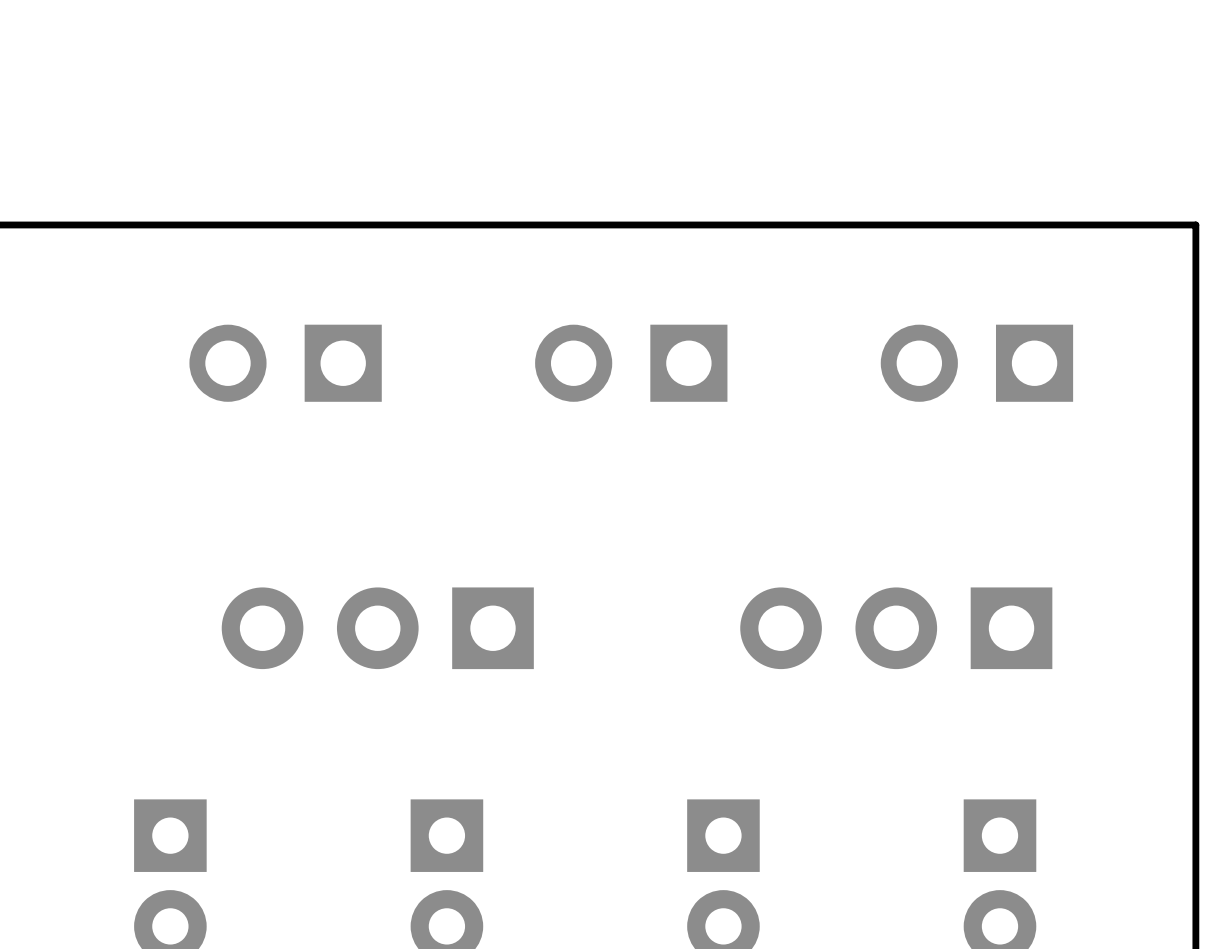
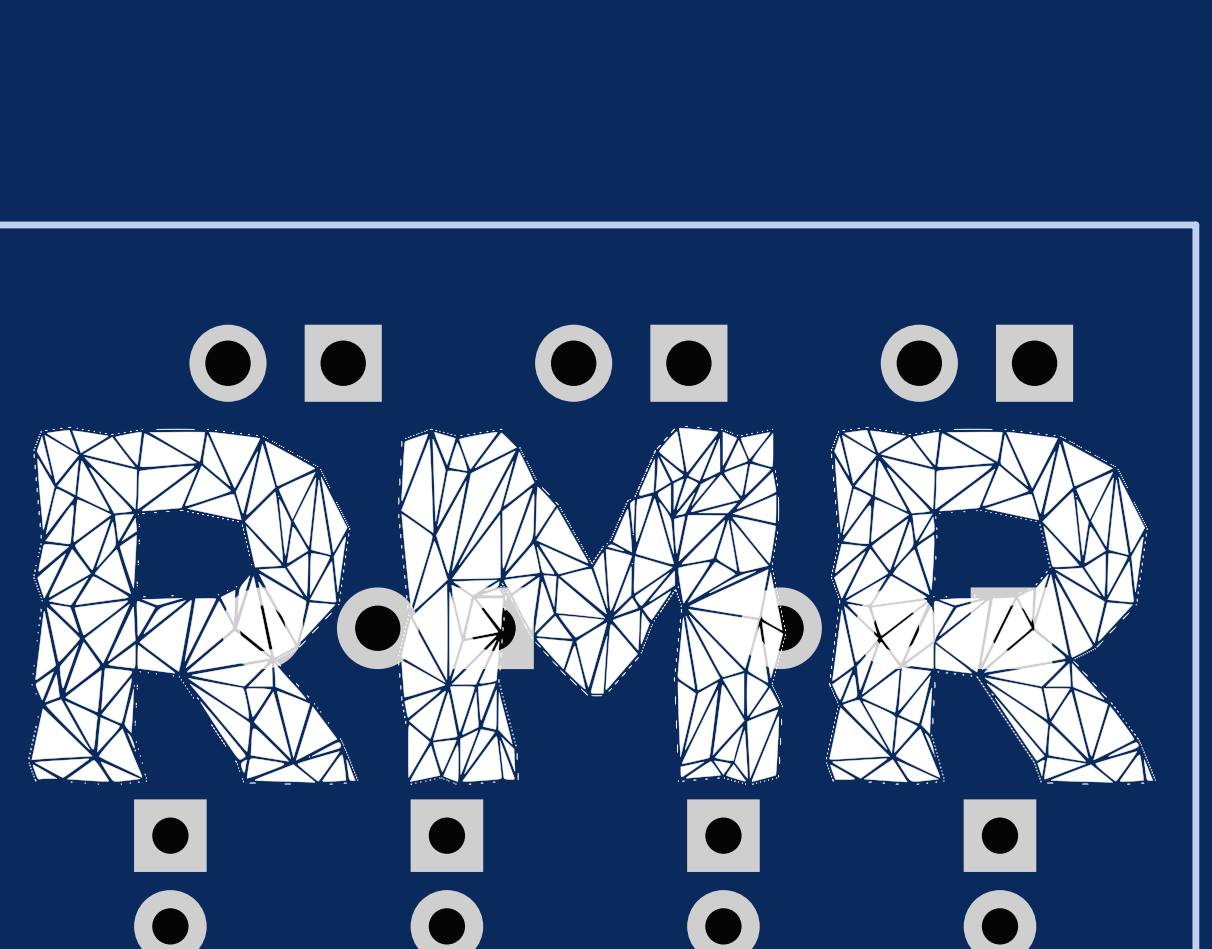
drawing: none -> [28, 425, 1157, 785]

